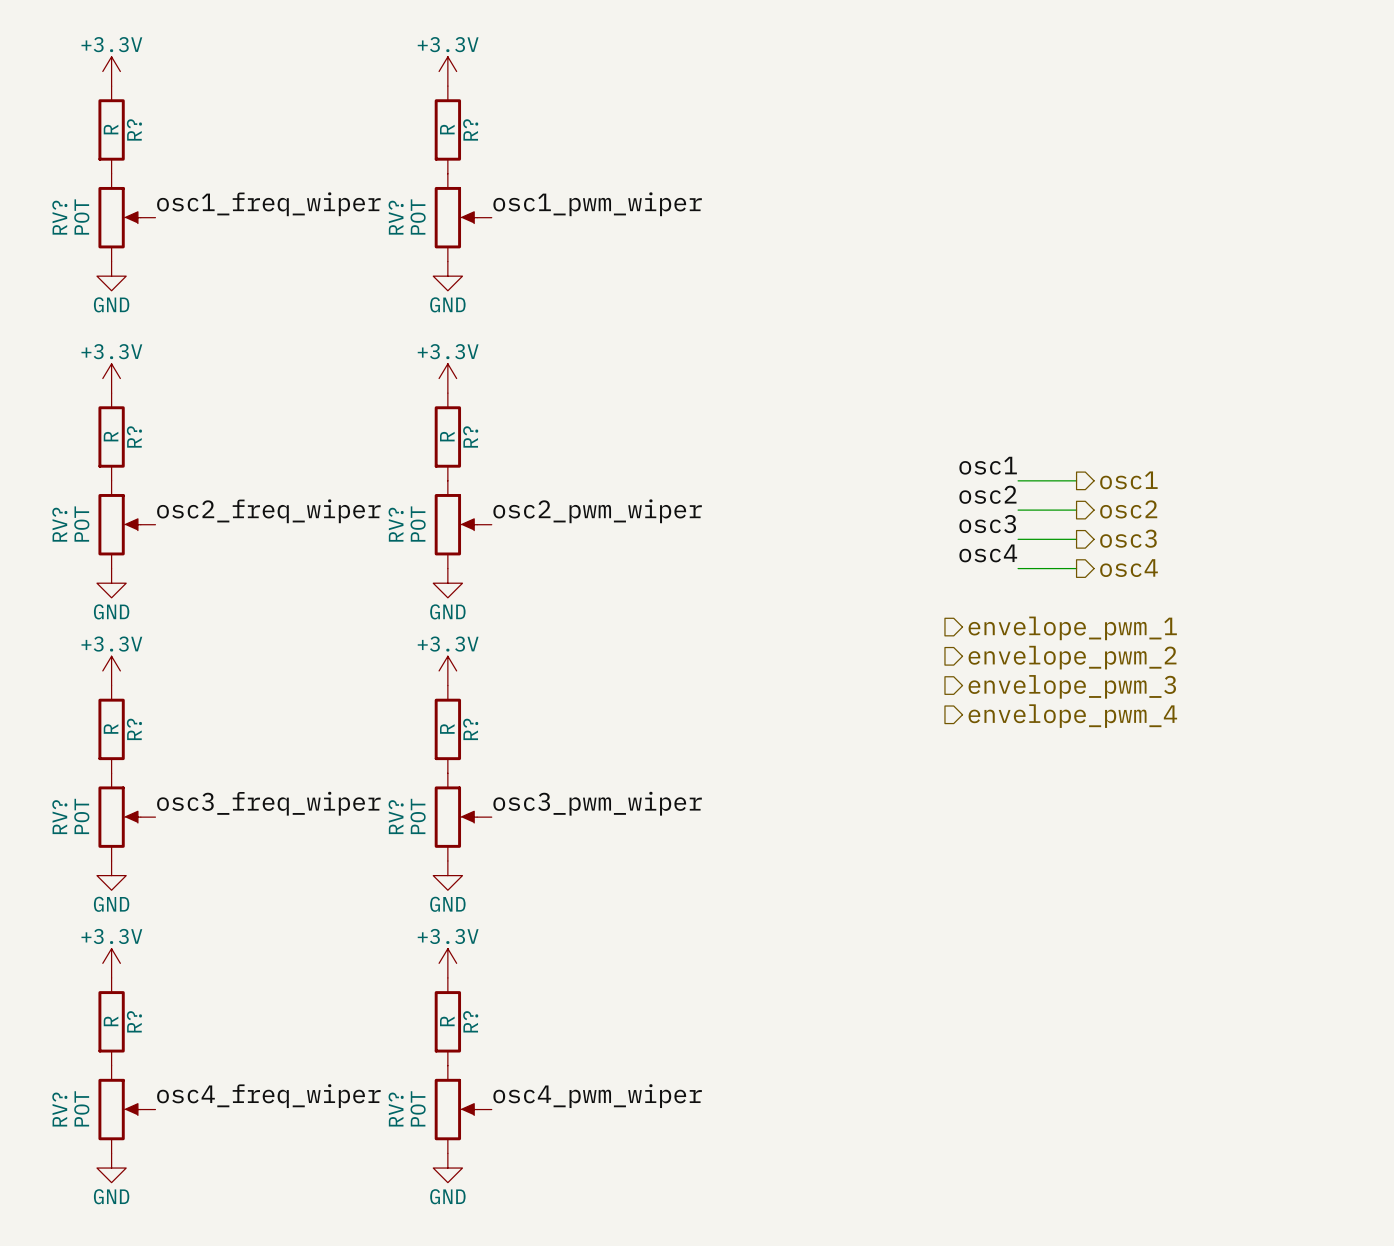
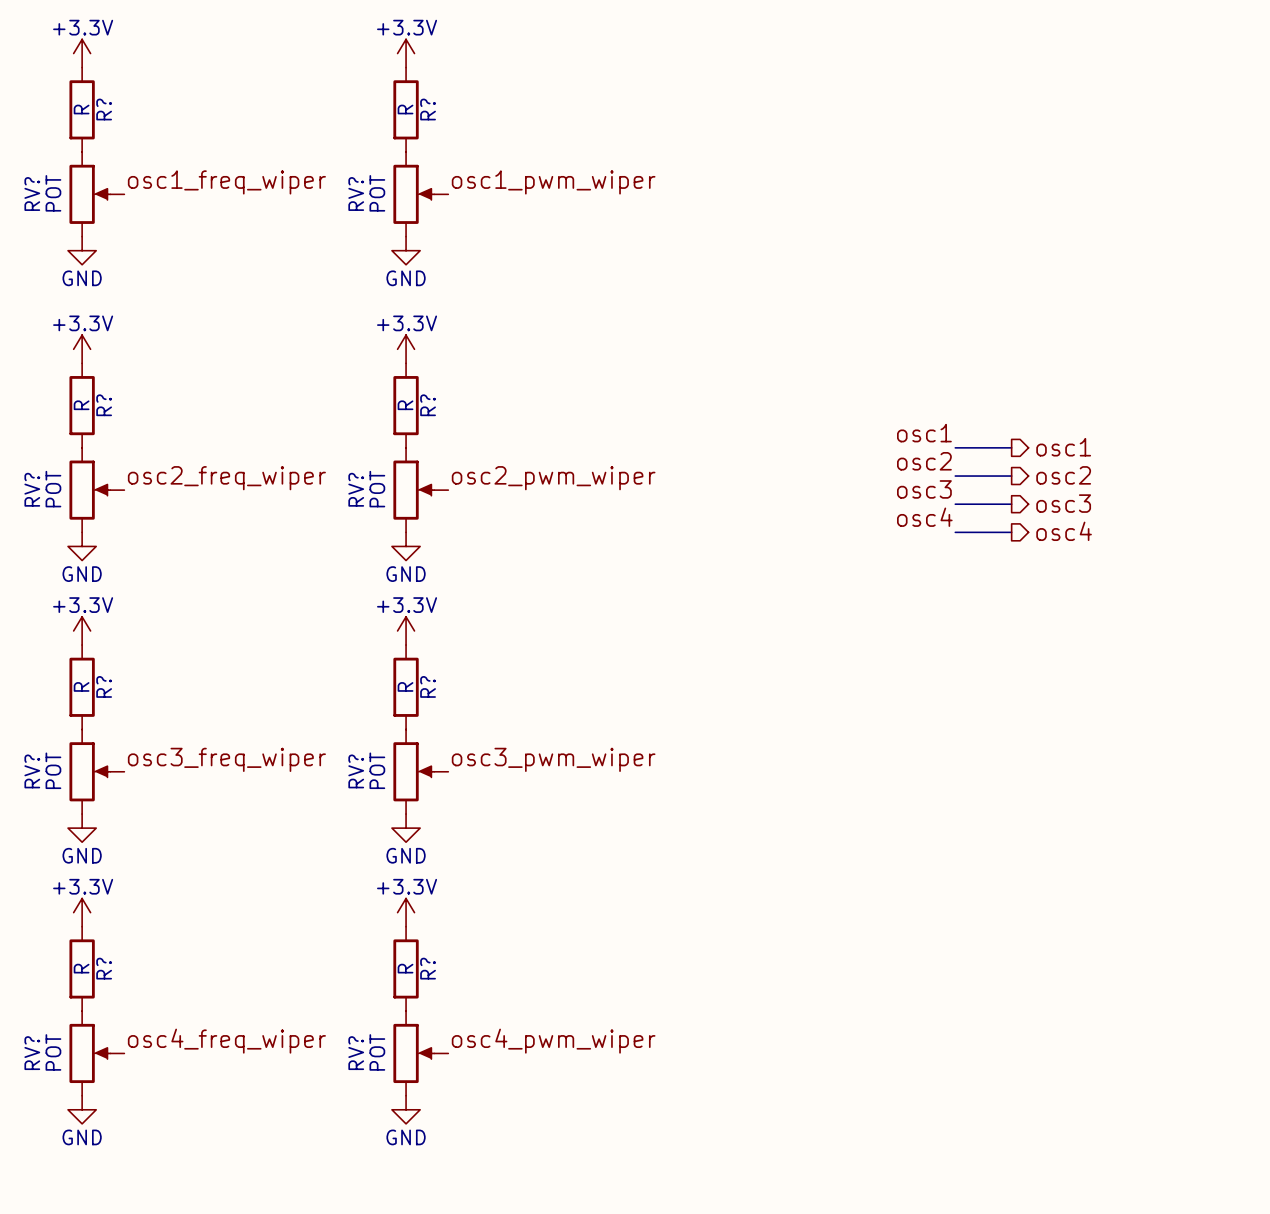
hierarchical label: envelope_pwm_1 (1072, 628) -> none
hierarchical label: envelope_pwm_2 (1072, 657) -> none
hierarchical label: envelope_pwm_3 (1072, 686) -> none
hierarchical label: envelope_pwm_4 (1072, 716) -> none

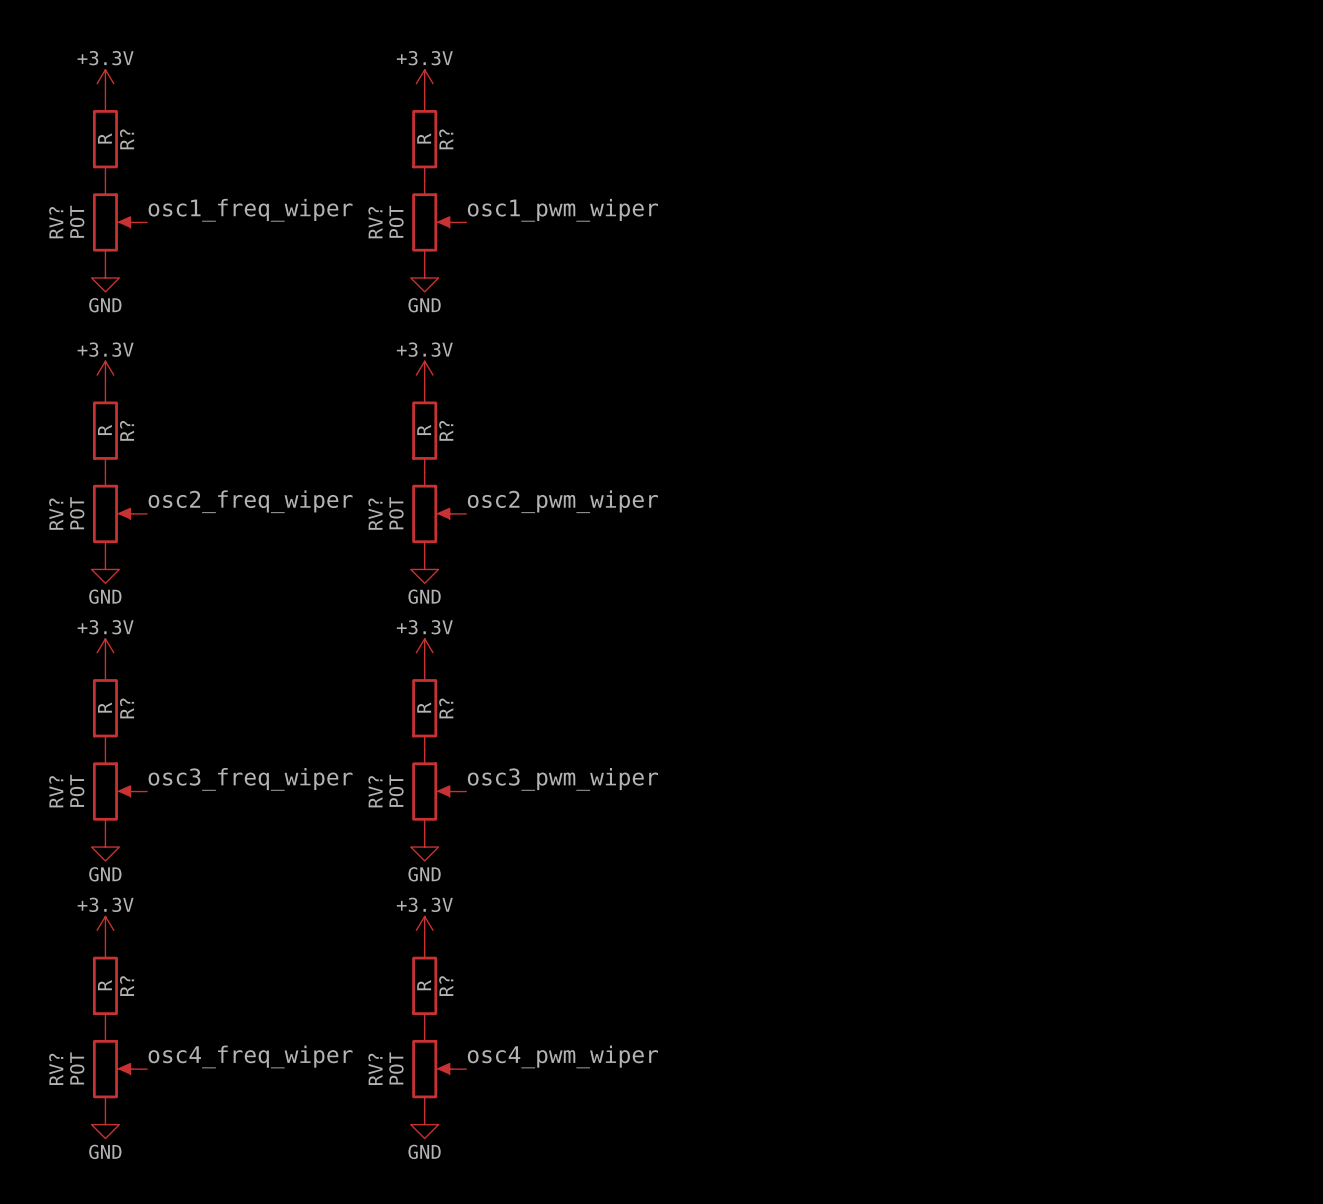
label: osc1 (924, 433) -> none
wire: (955, 447) (1011, 447) -> none
hierarchical label: osc1 (1063, 447) -> none
label: osc2 (924, 461) -> none
hierarchical label: osc2 (1063, 475) -> none
wire: (955, 476) (1011, 476) -> none
label: osc3 (924, 489) -> none
hierarchical label: osc3 (1063, 503) -> none
wire: (955, 504) (1011, 504) -> none
label: osc4 (924, 517) -> none
hierarchical label: osc4 (1064, 531) -> none
wire: (955, 532) (1011, 532) -> none

